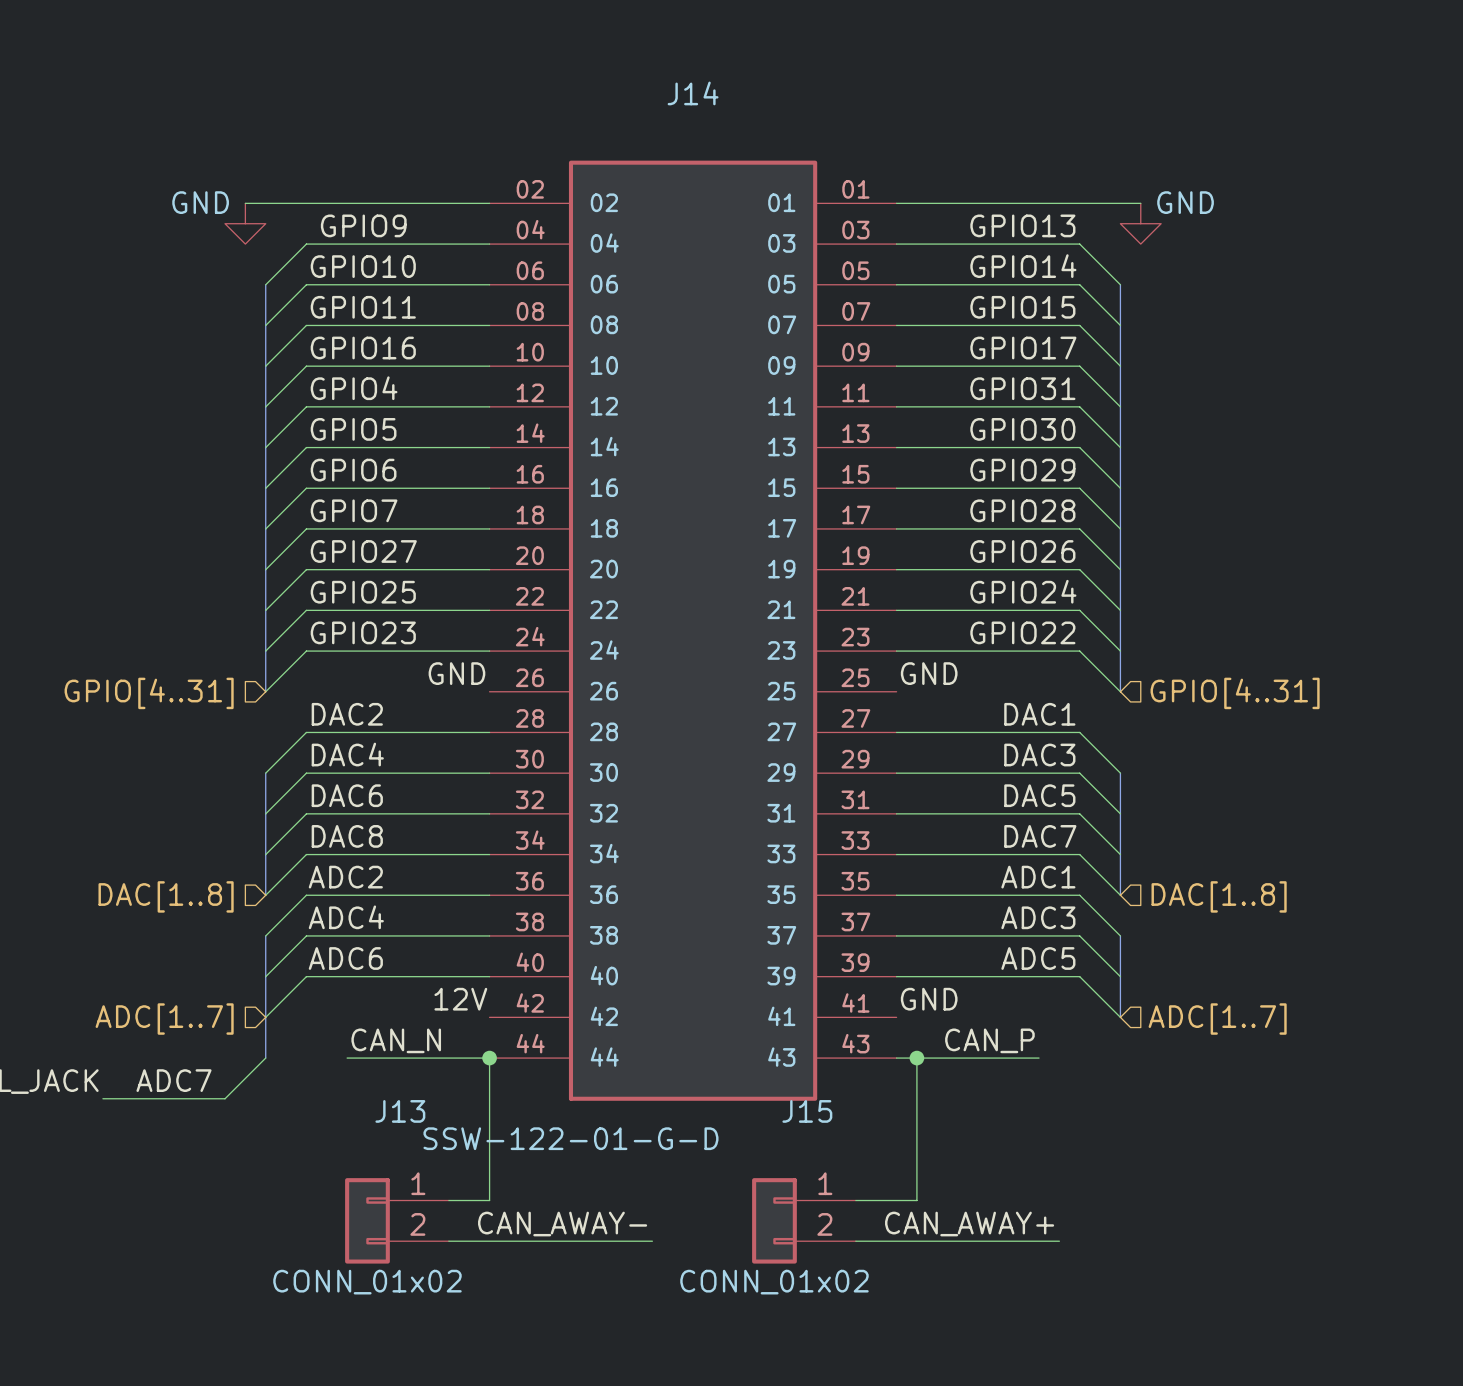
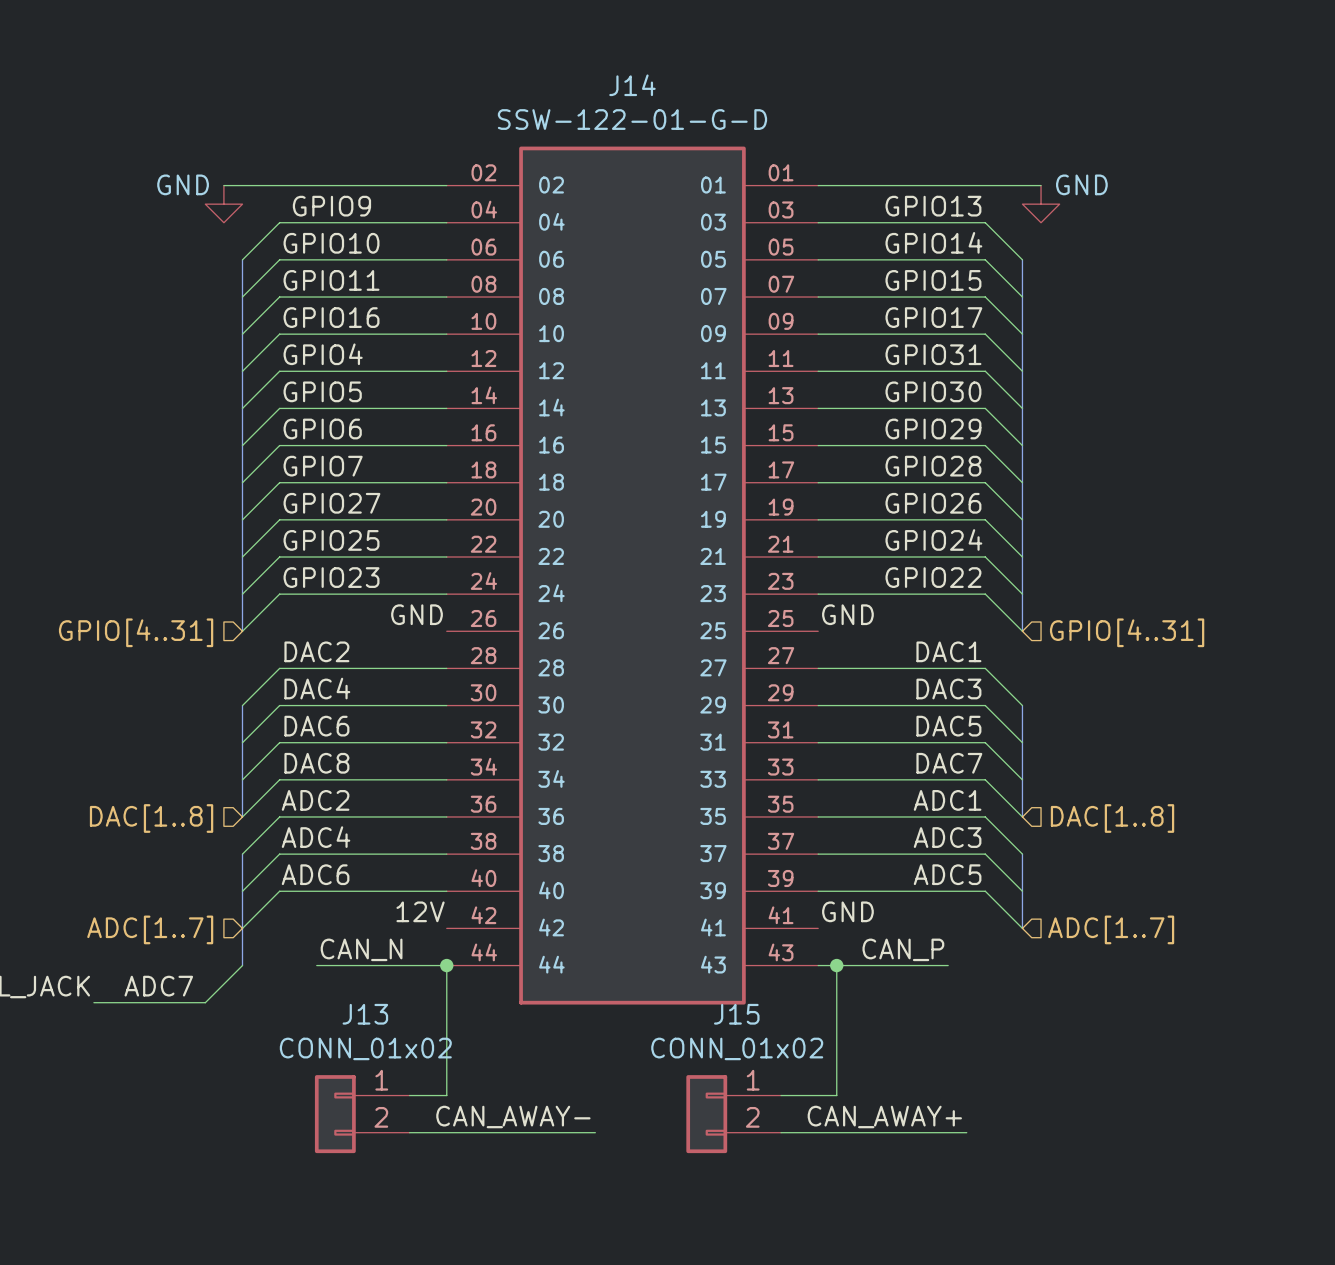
J14 value position: SSW-122-01-G-D (570, 1138) -> SSW-122-01-G-D (632, 119)
J13 value position: CONN_01x02 (367, 1282) -> CONN_01x02 (365, 1048)
J15 value position: CONN_01x02 (774, 1282) -> CONN_01x02 (737, 1048)

